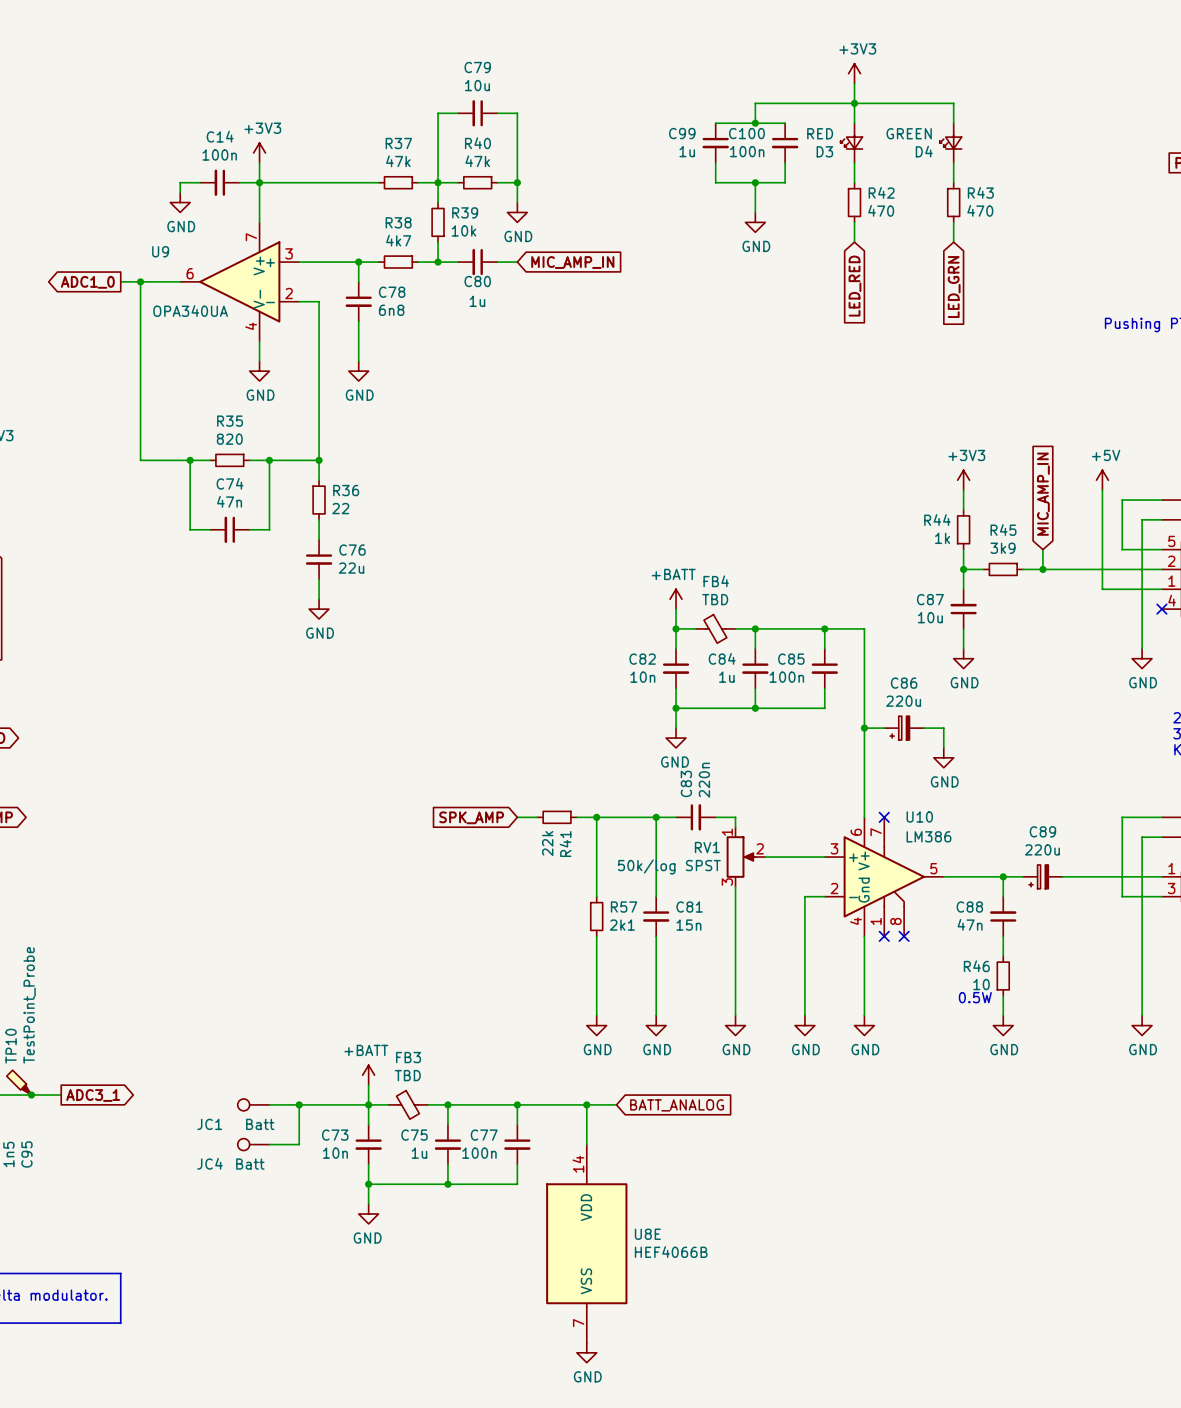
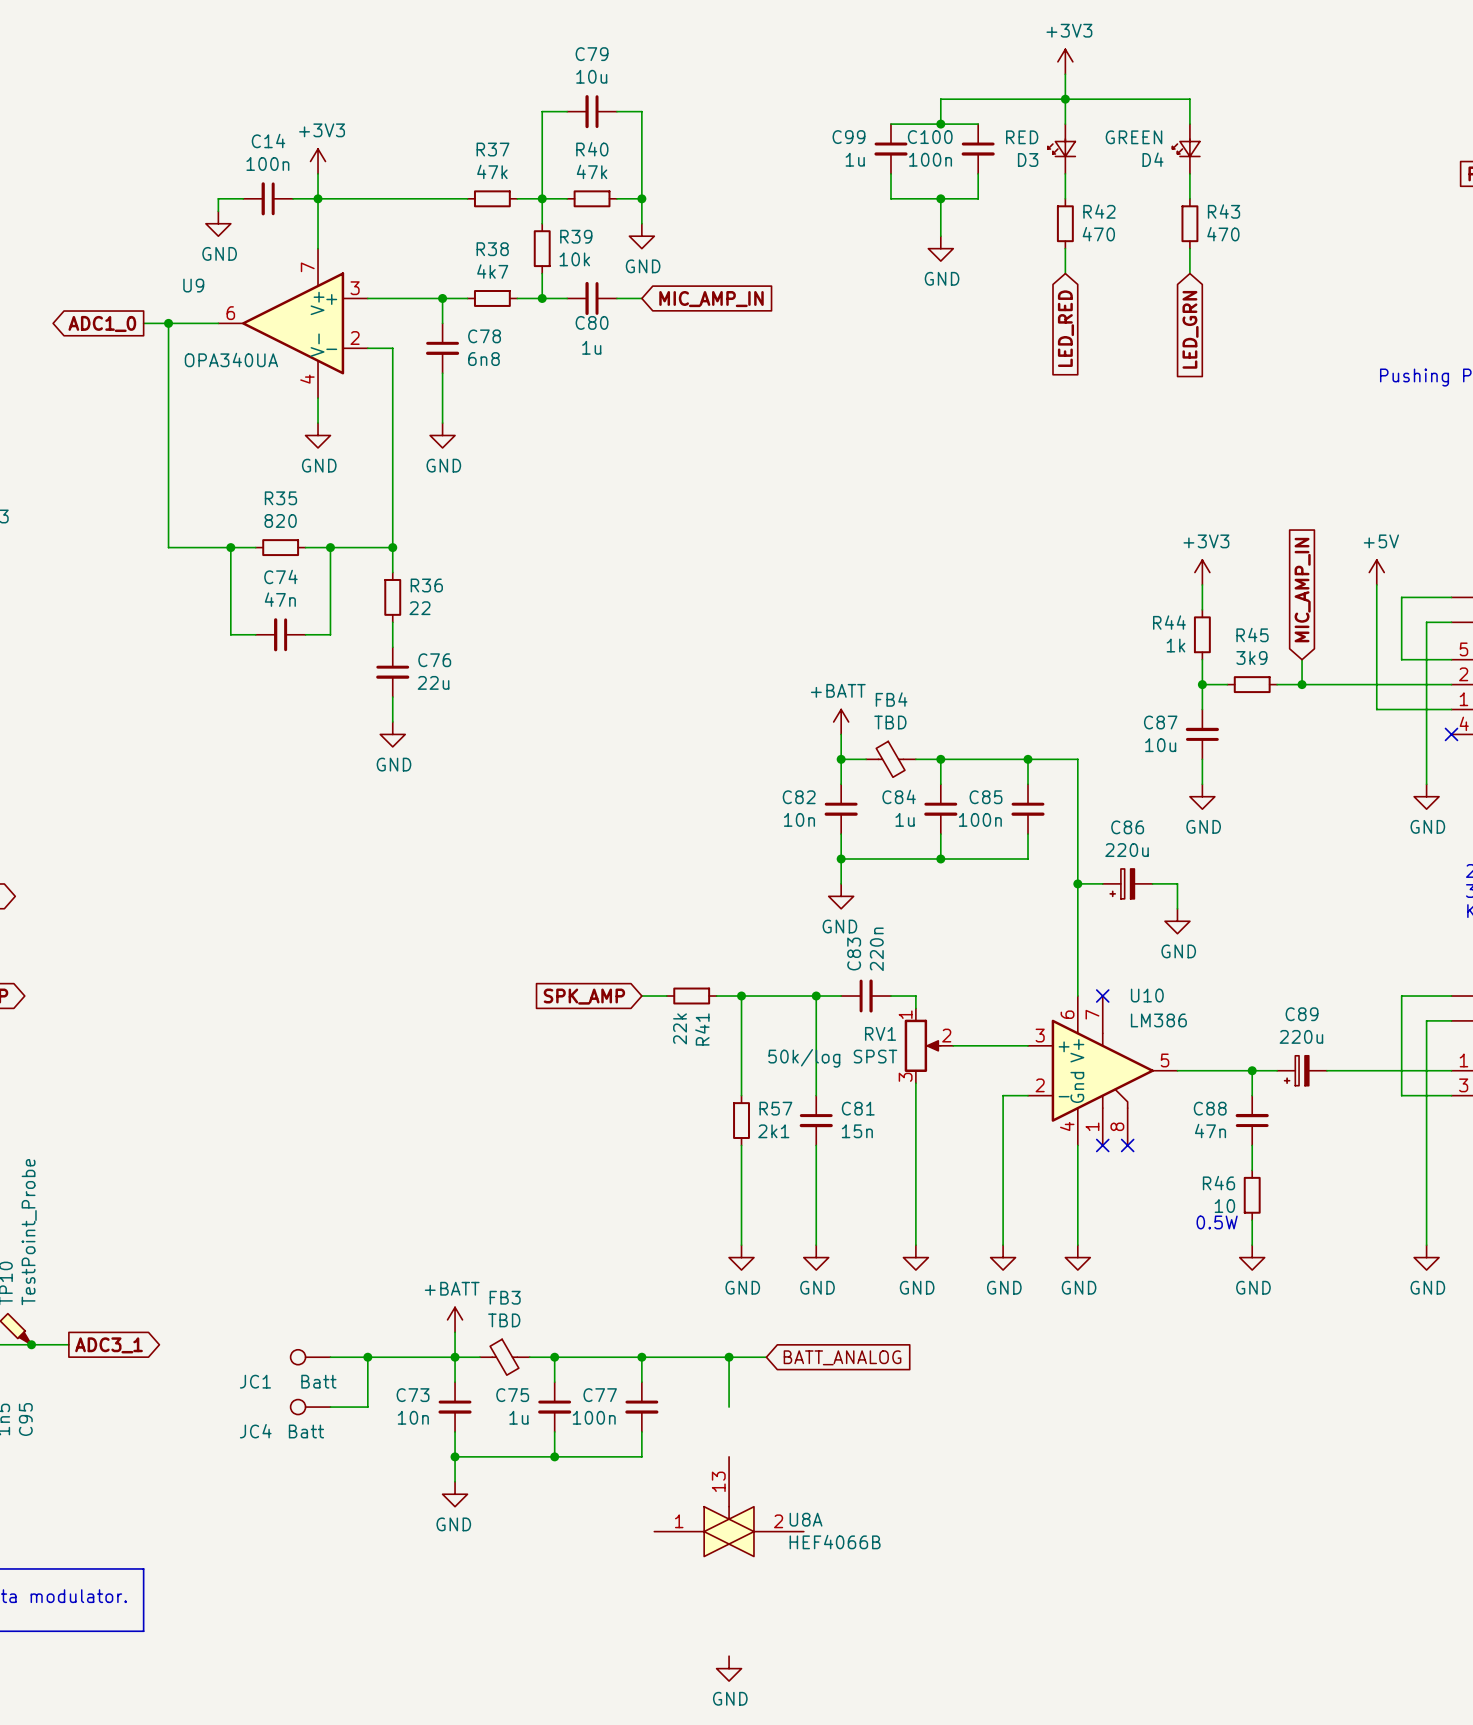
U8A: none -> HEF4066B (729, 1506)
U8E: HEF4066B (586, 1243) -> none

